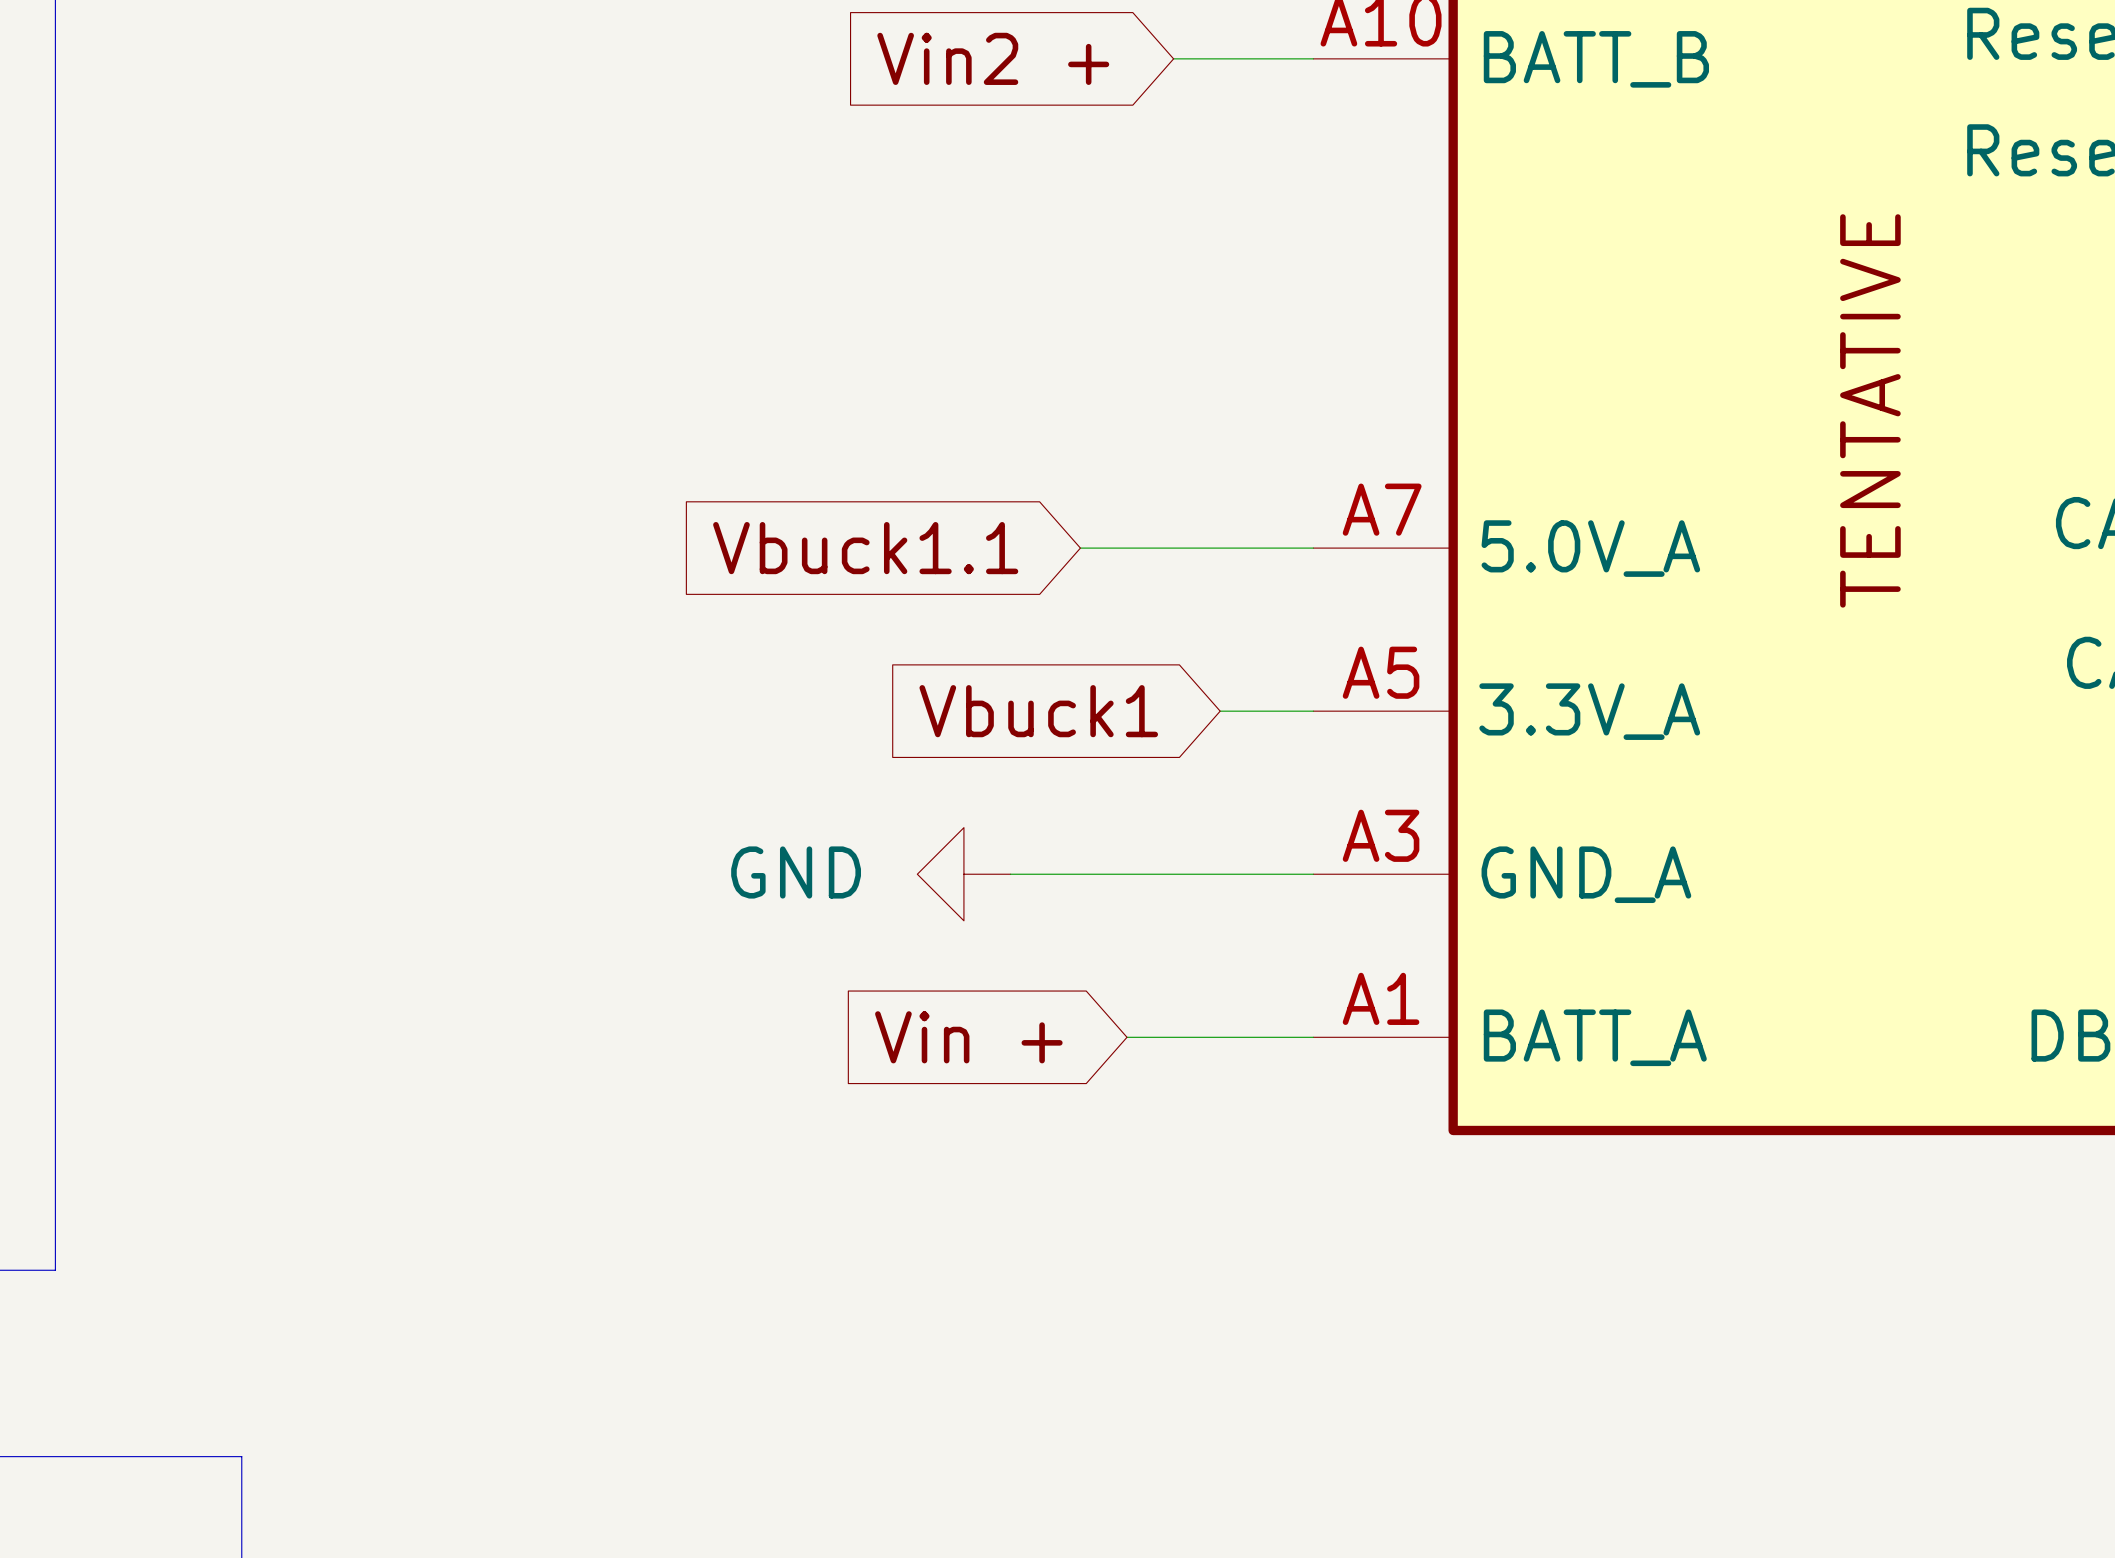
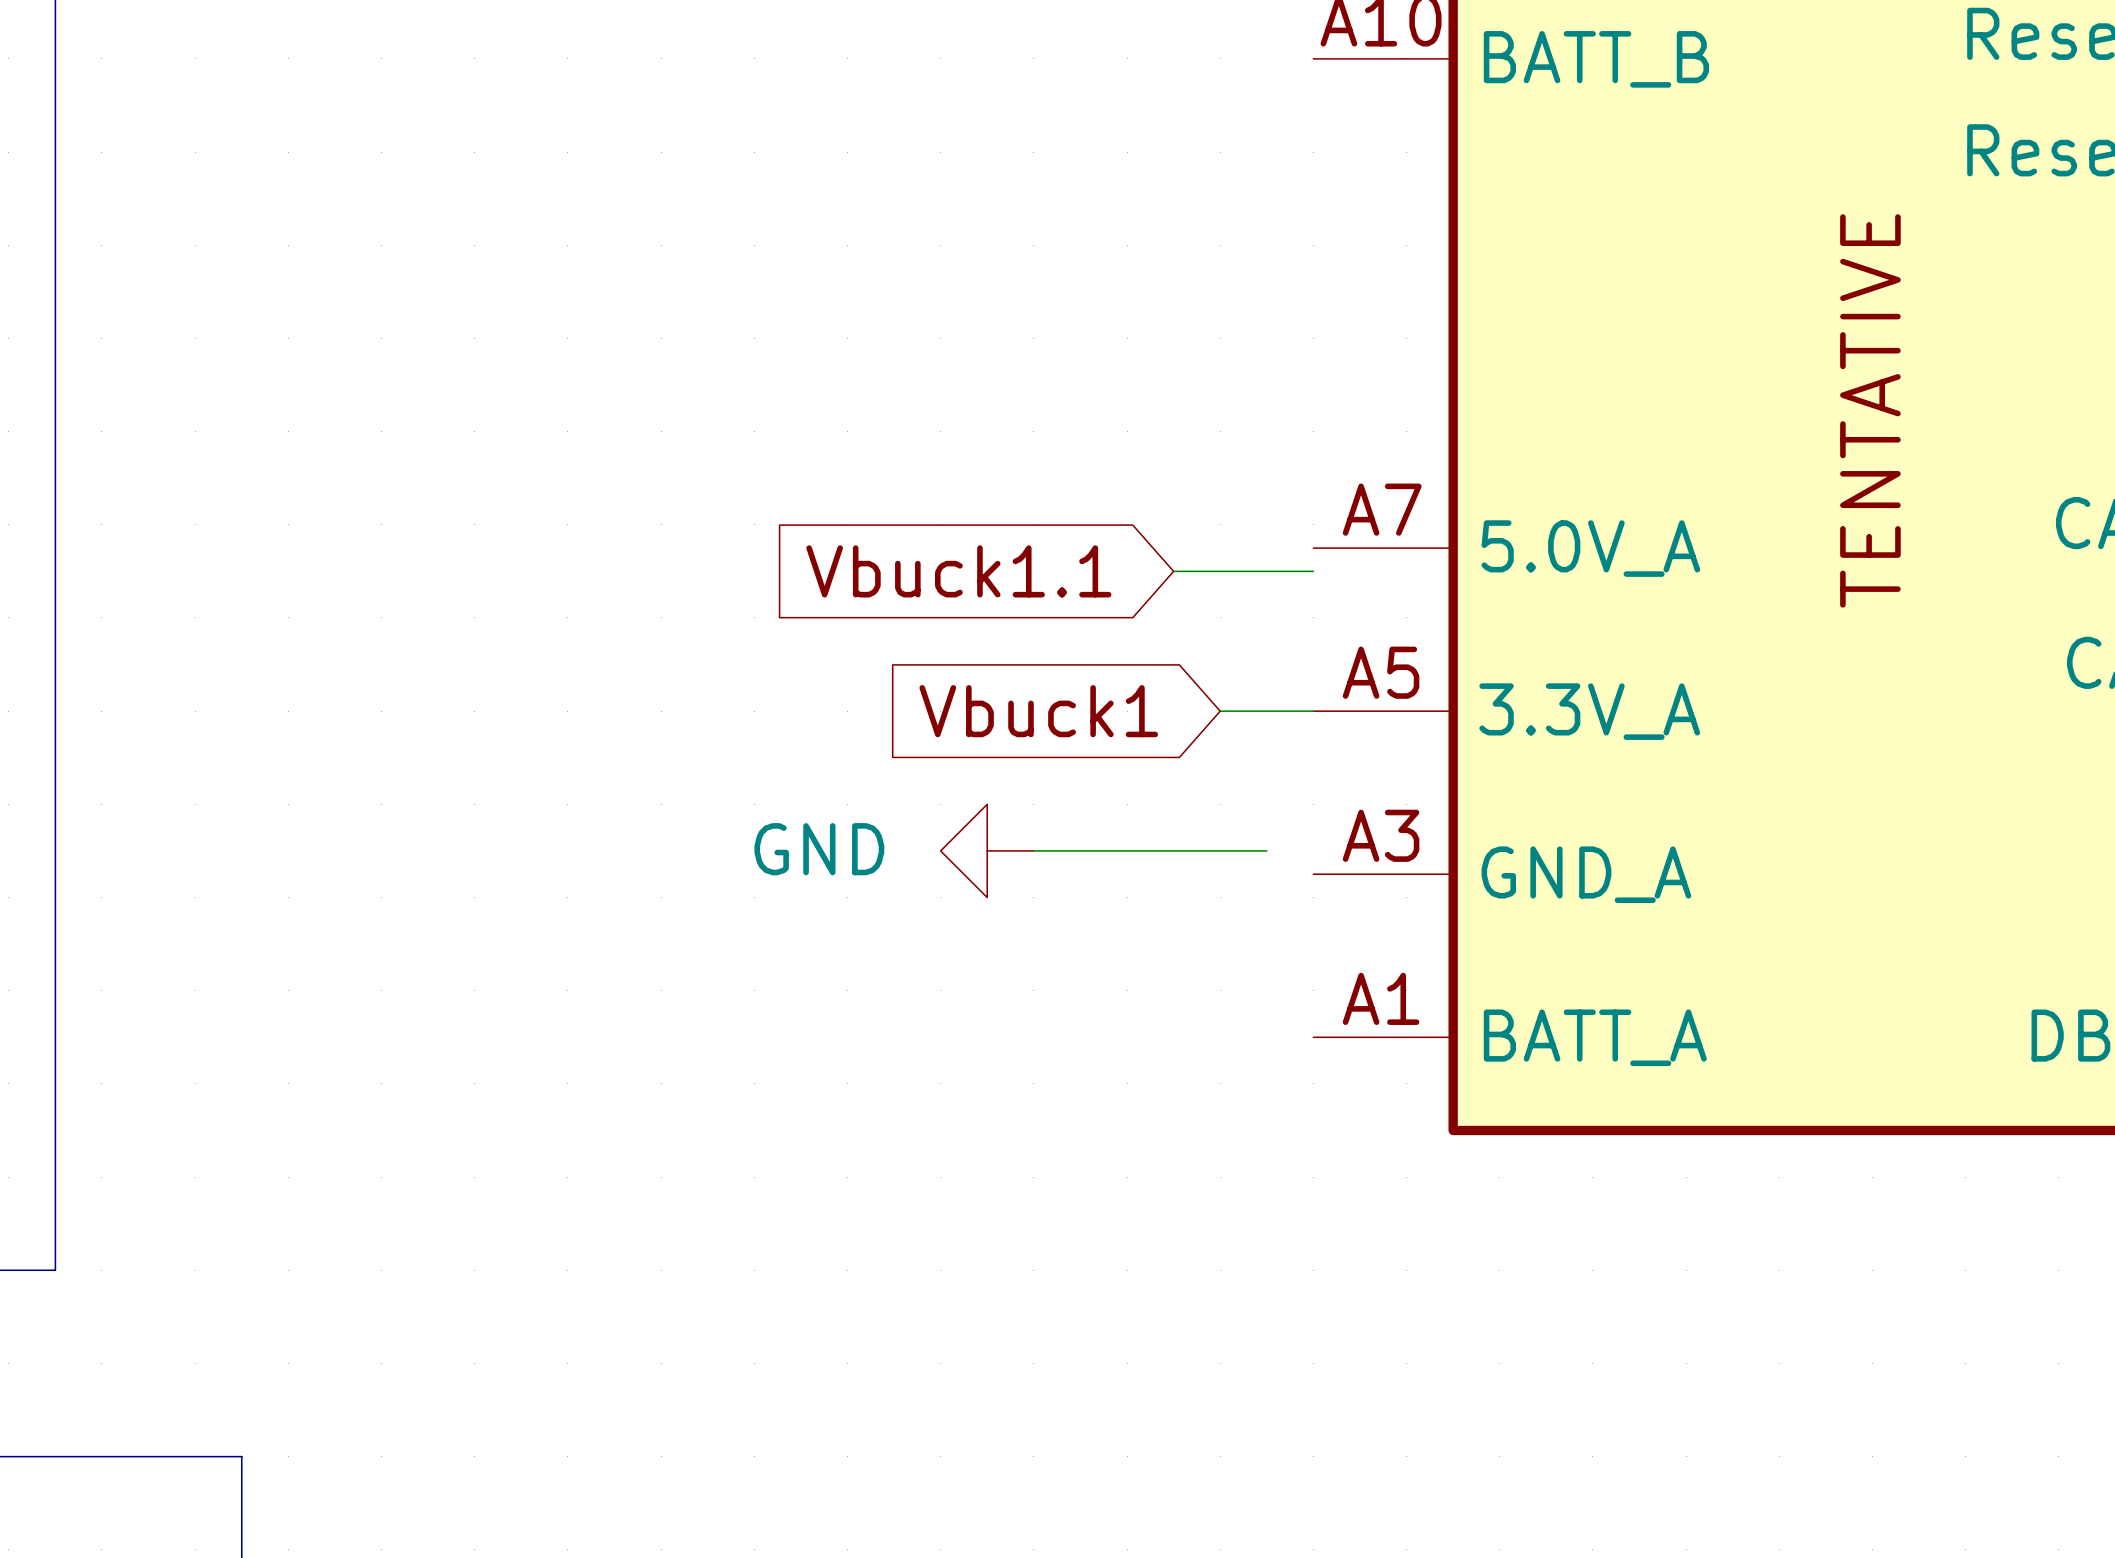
global label: Vin2 + (993, 58) -> none
wire: (1173, 58) (1313, 58) -> (1173, 571) (1313, 571)
global label position: Vbuck1.1 (865, 548) -> Vbuck1.1 (958, 571)
wire: (1080, 548) (1313, 548) -> (1033, 850) (1266, 850)
power symbol position: GND (963, 874) -> GND (987, 850)
wire: (1010, 874) (1313, 874) -> none
global label: Vin + (968, 1037) -> none
wire: (1127, 1037) (1313, 1037) -> none

